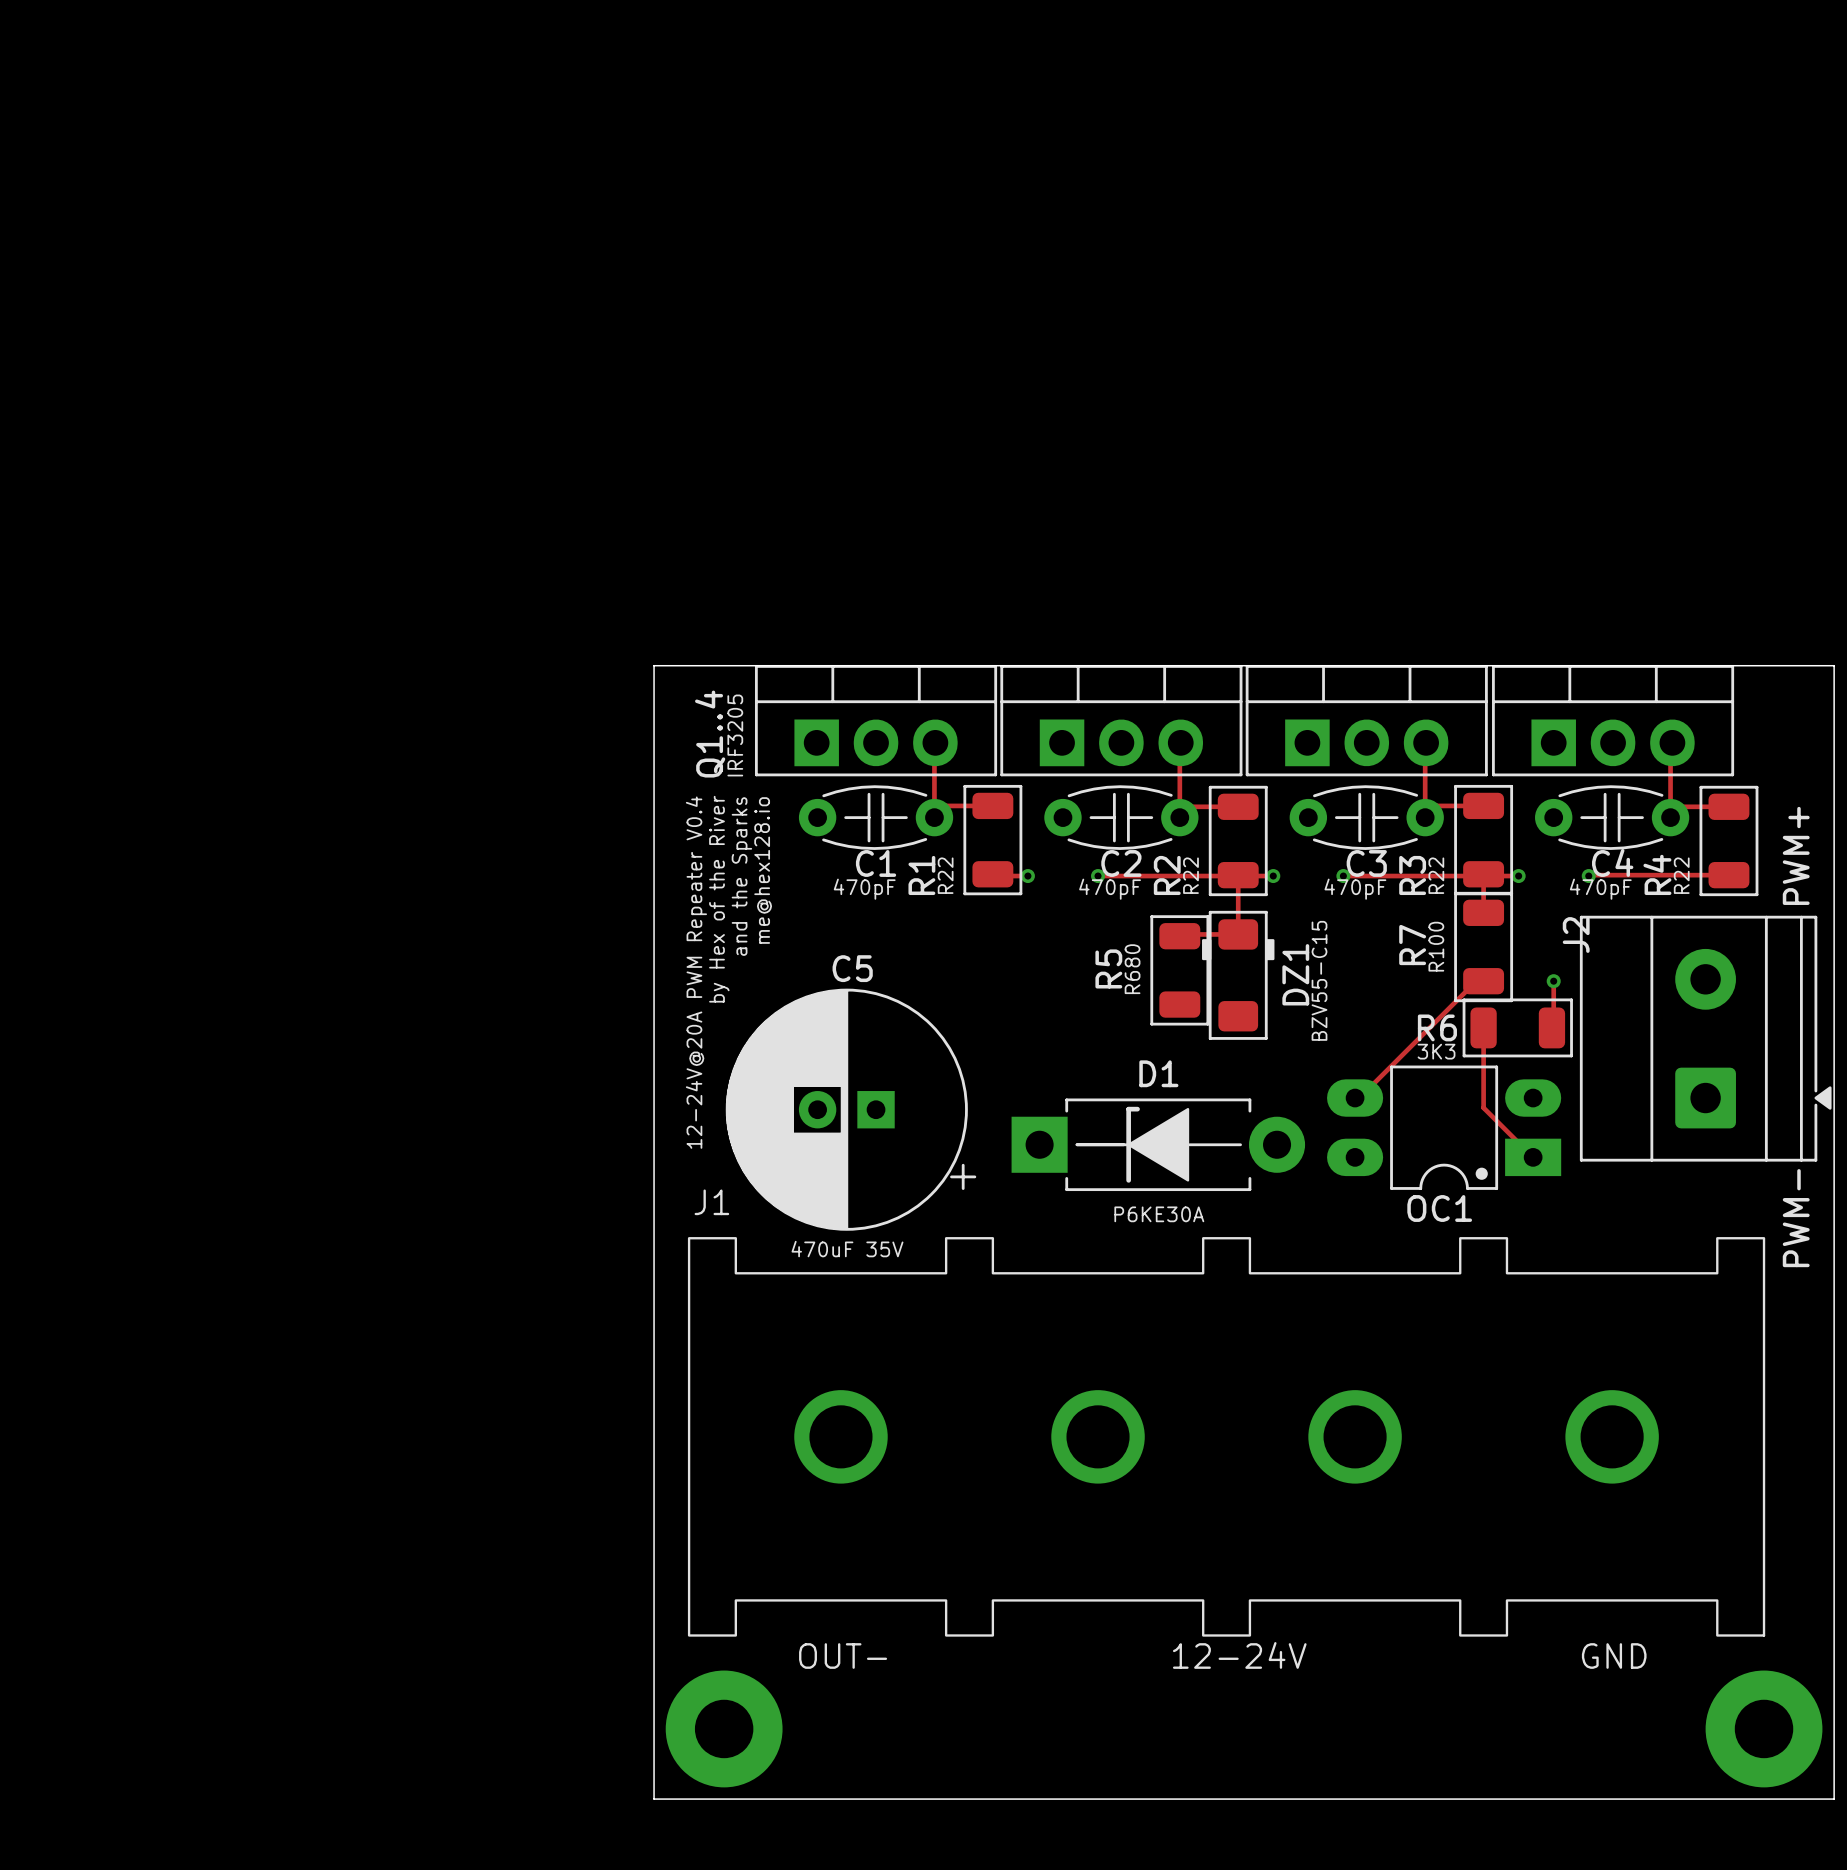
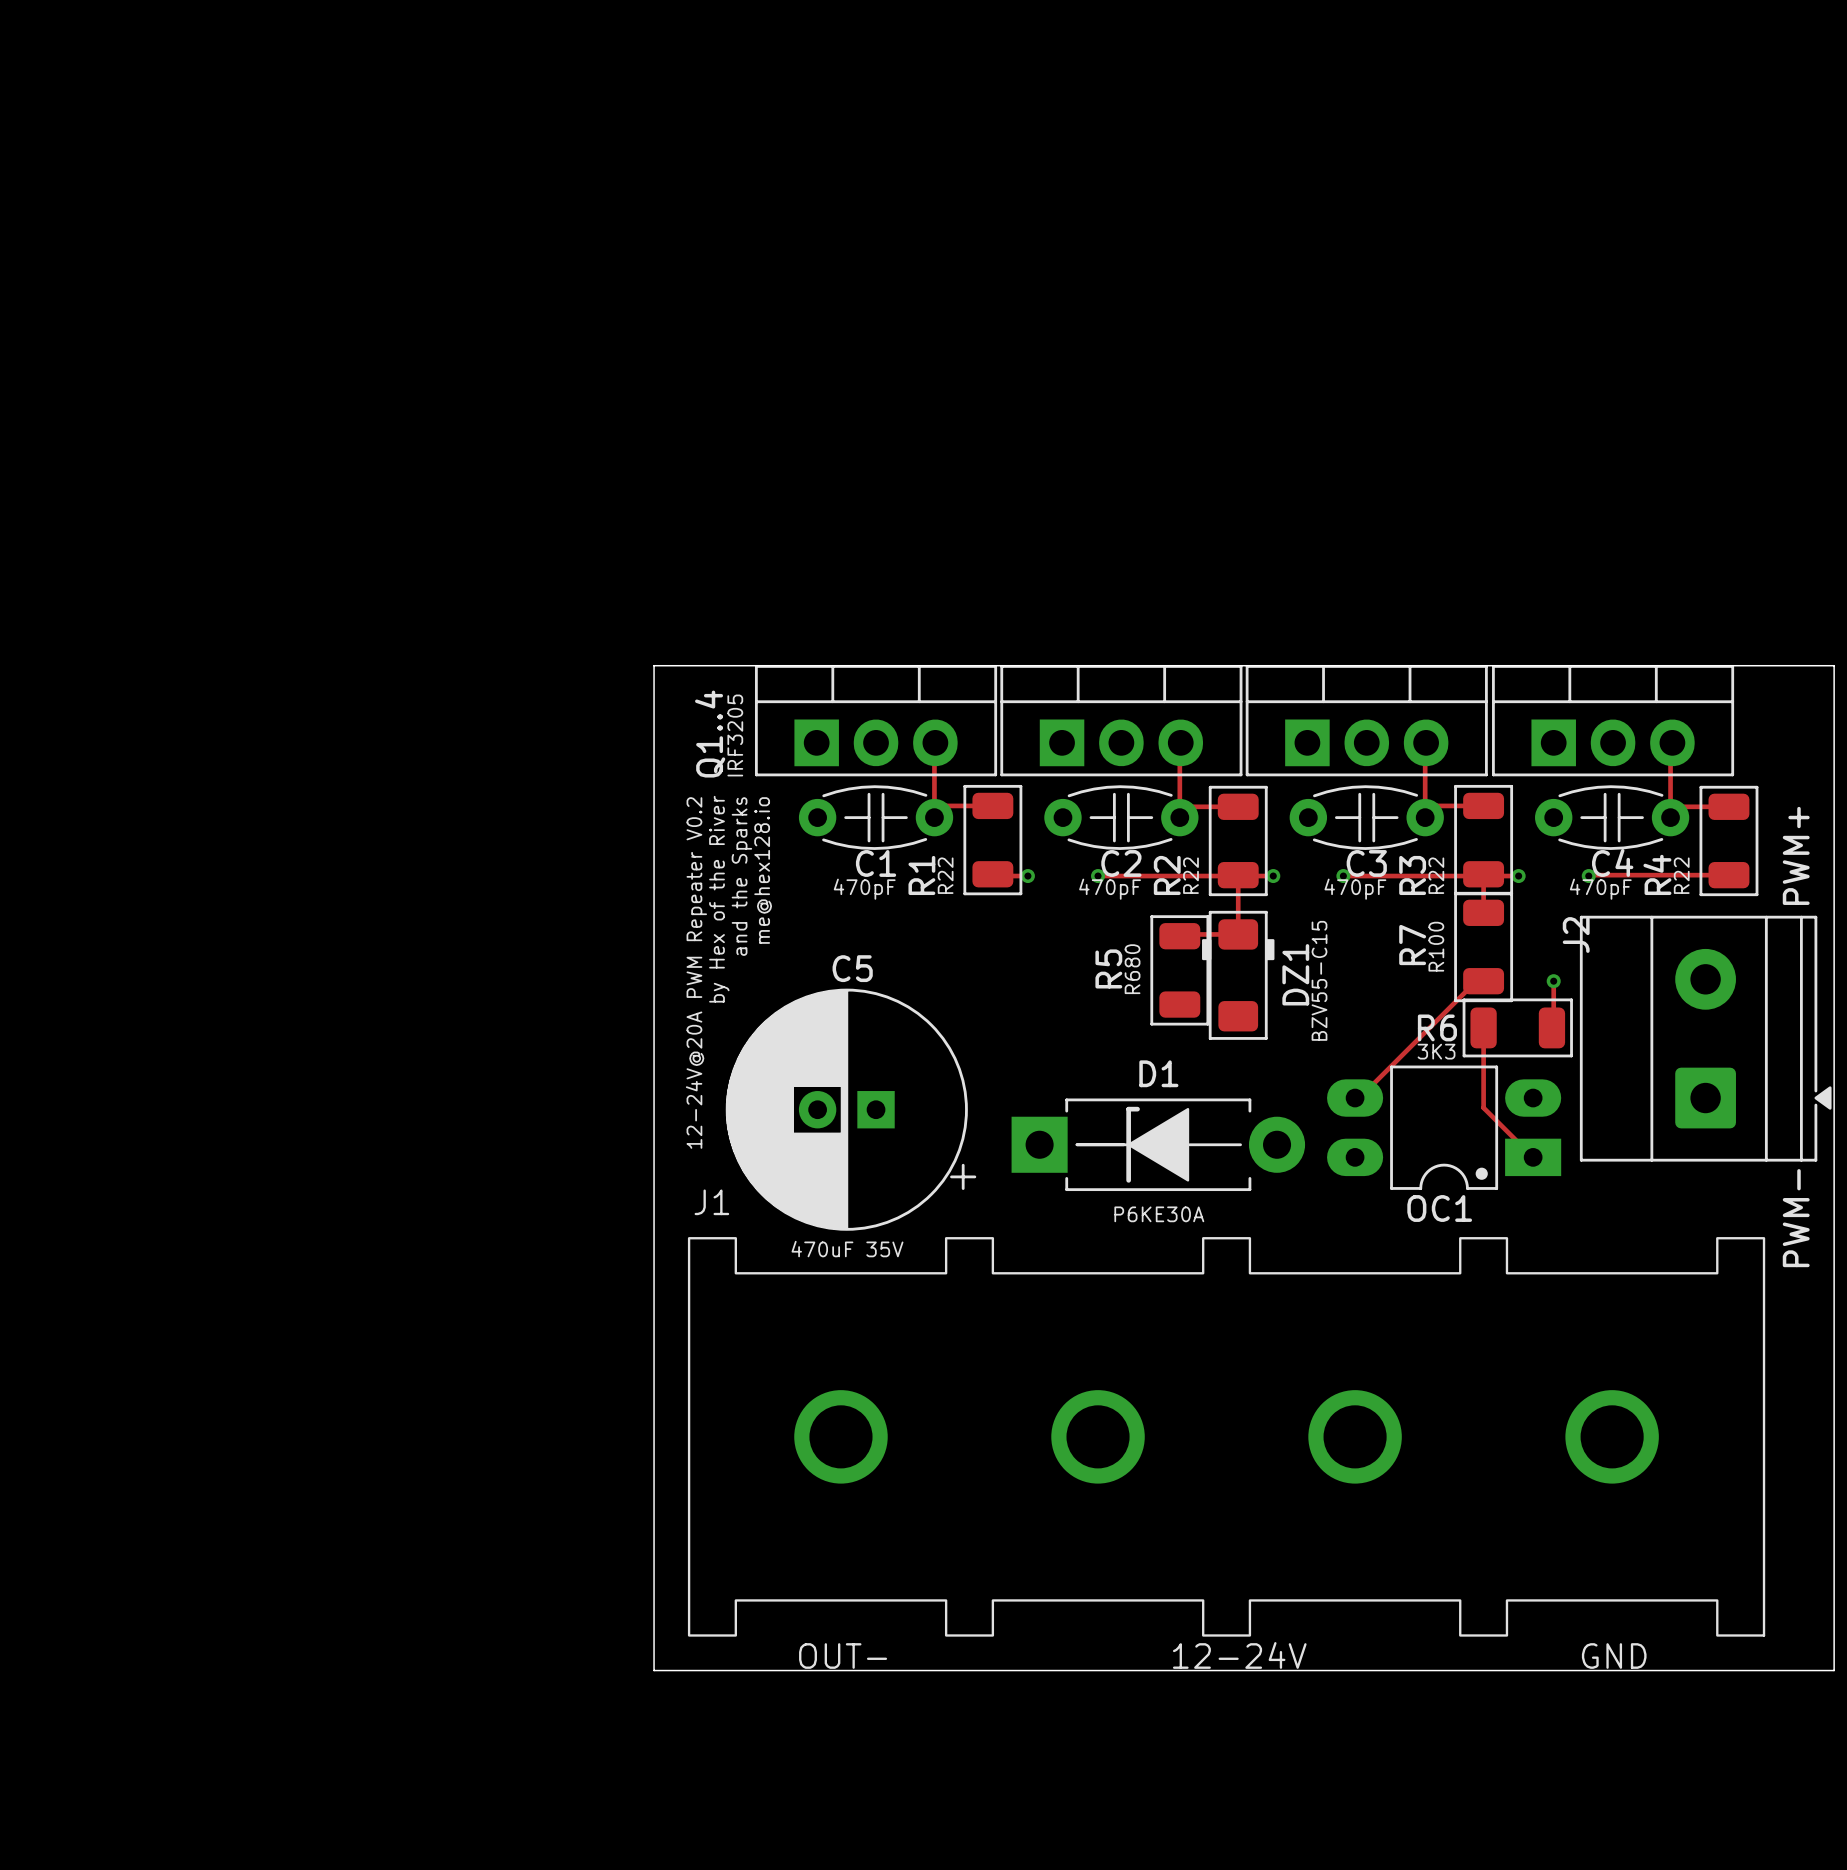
text: 12-24V@20A PWM Repeater V0.4 (696, 972) -> 12-24V@20A PWM Repeater V0.2 (696, 972)
board edge: (654, 1670) (654, 1799) (1834, 1799) (1834, 1670) -> (654, 1670) (1834, 1670)
part: (724, 1728) -> none
part: (1764, 1728) -> none

